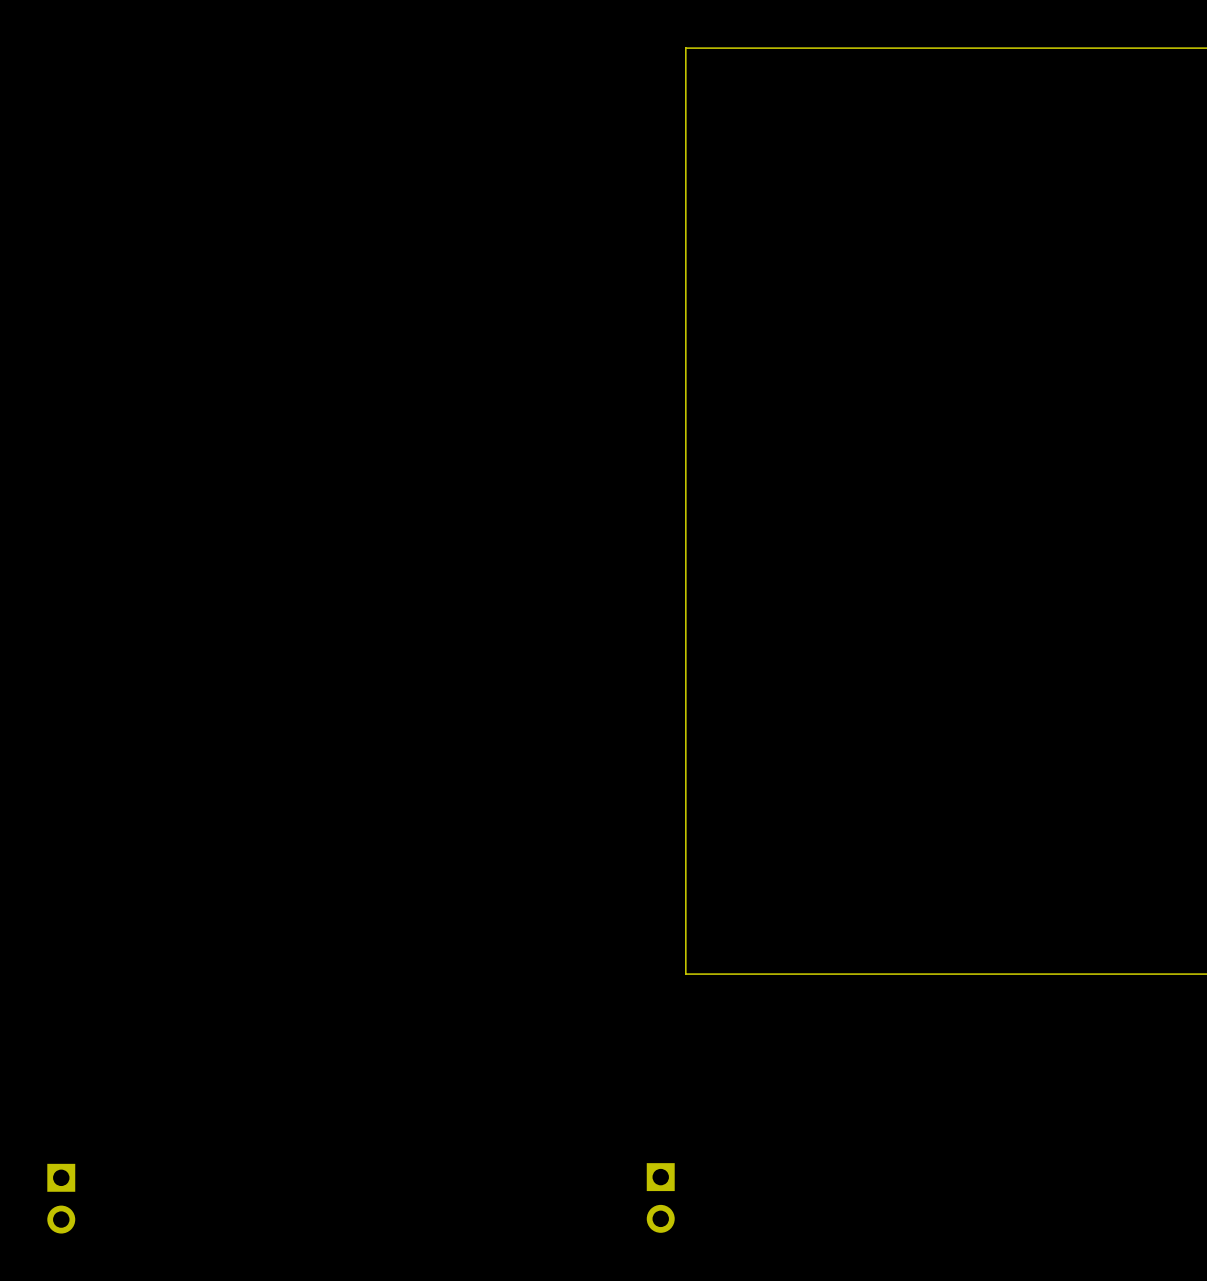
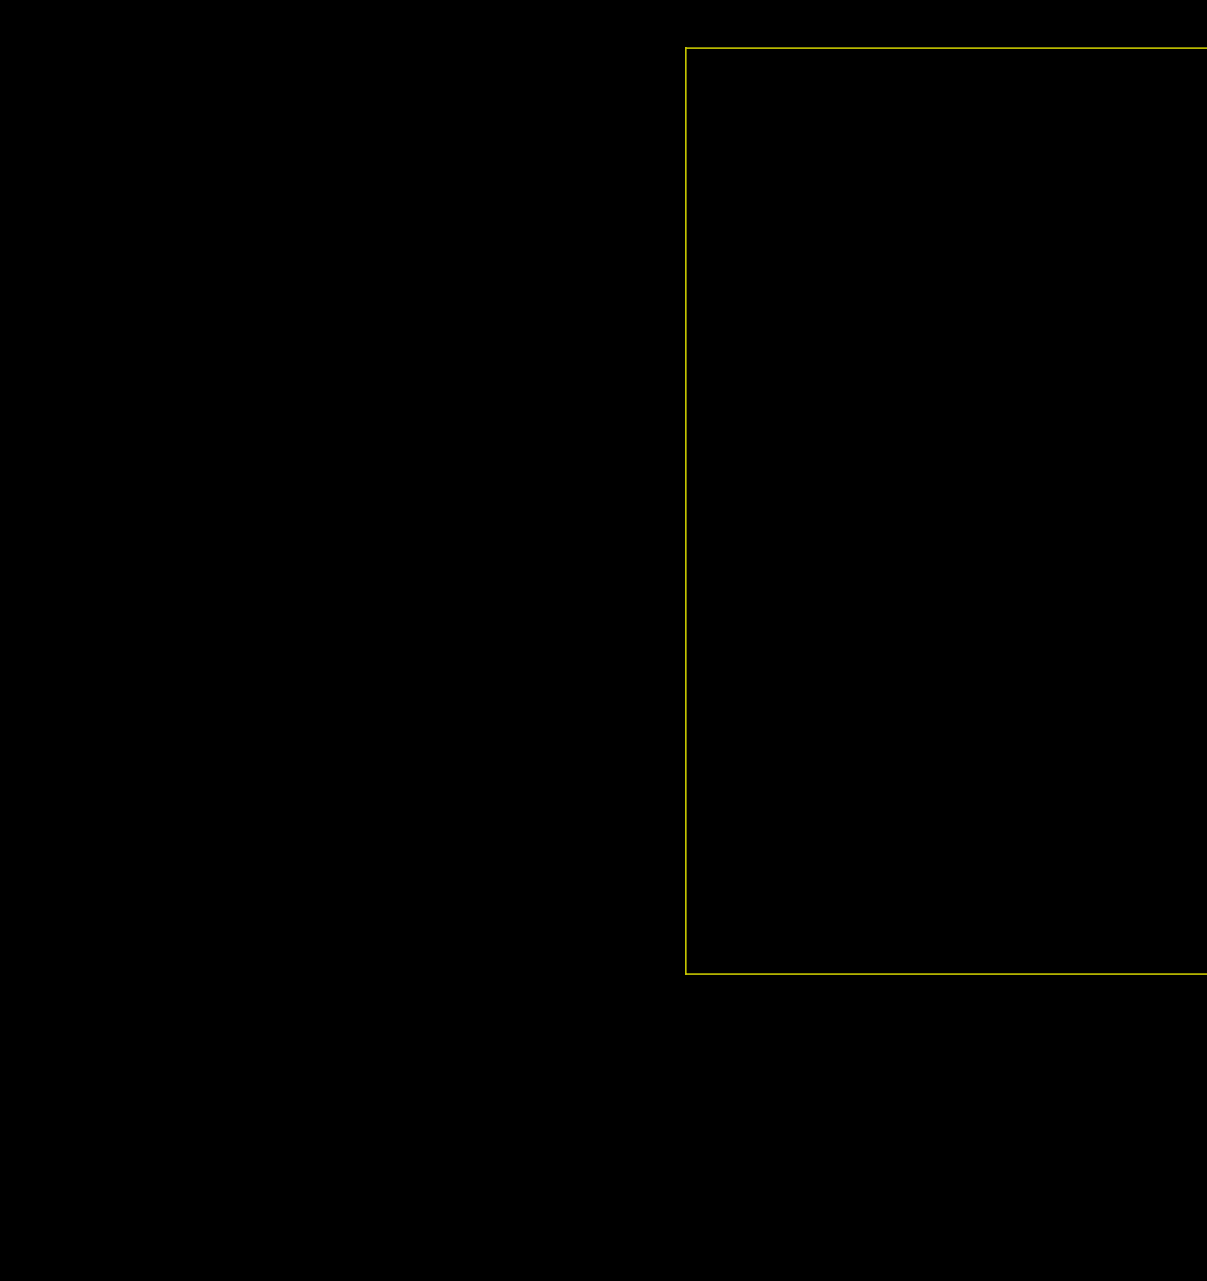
part: (660, 1197) -> none
part: (61, 1198) -> none

